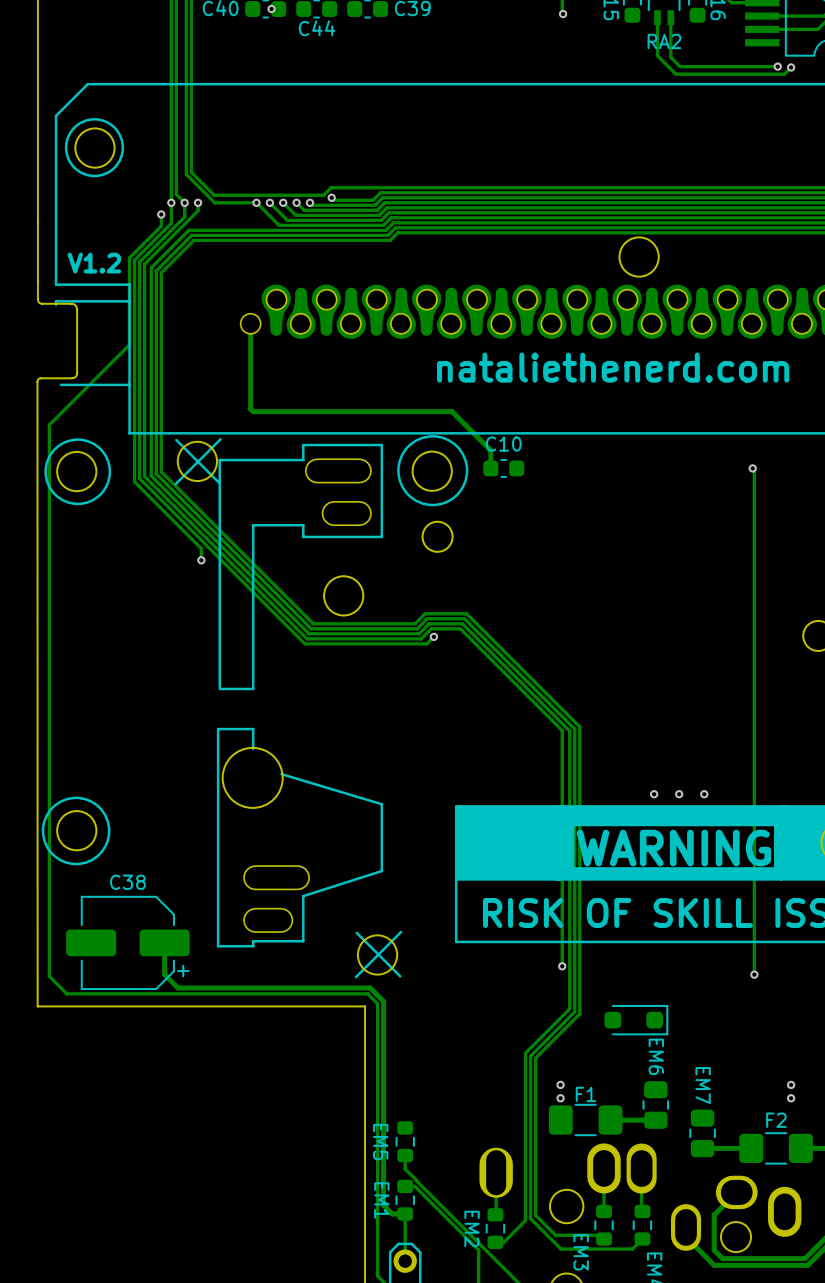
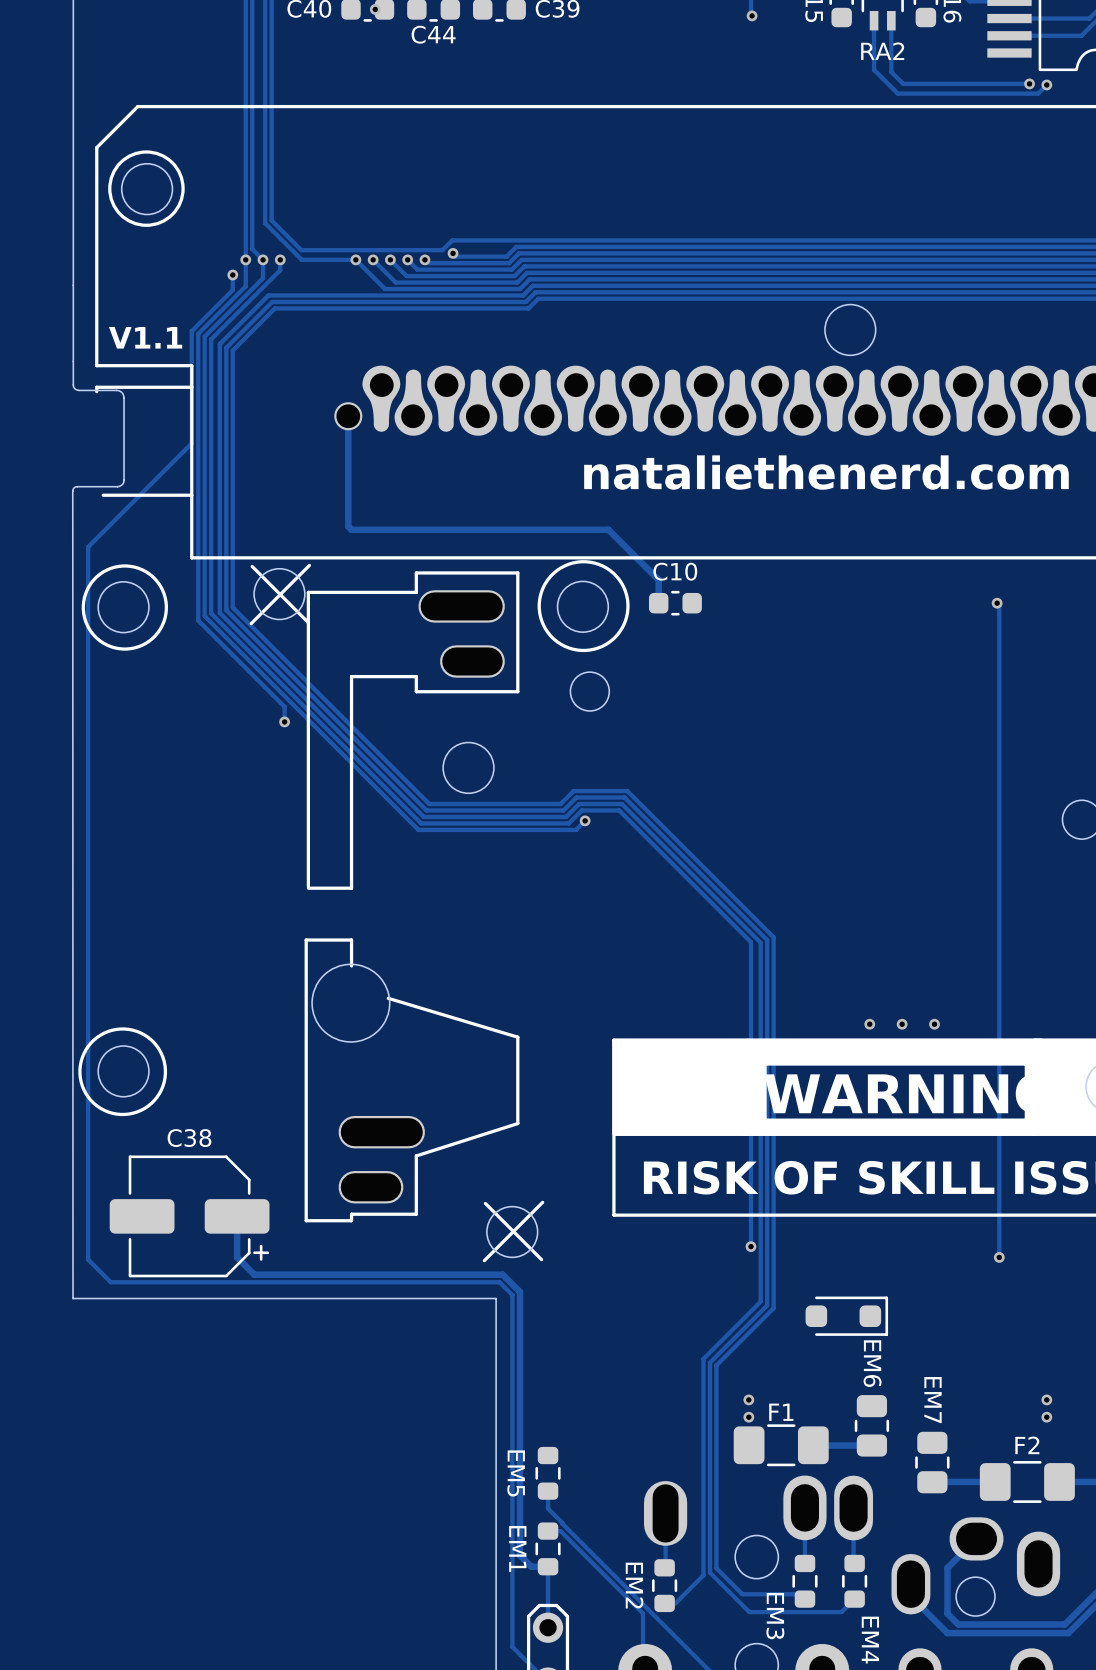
text: V1.2 (94, 263) -> V1.1 (145, 337)

